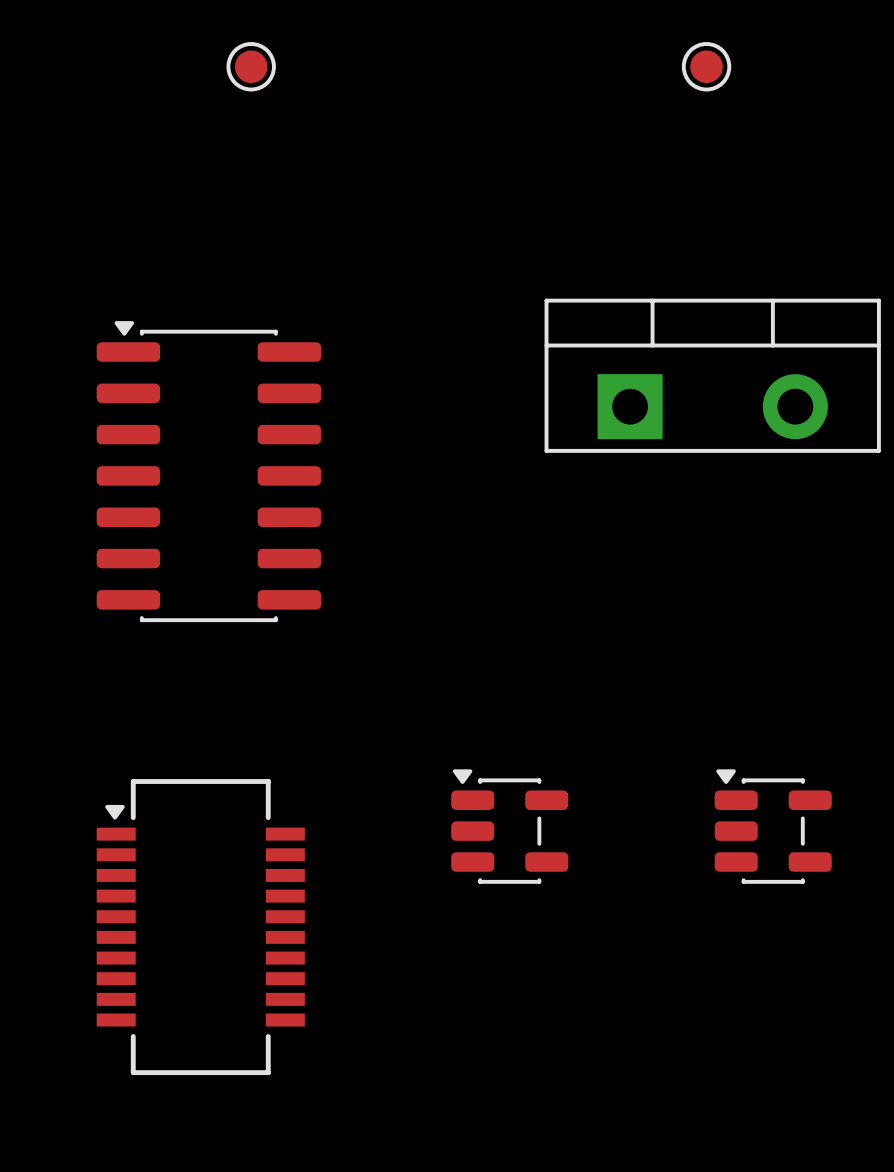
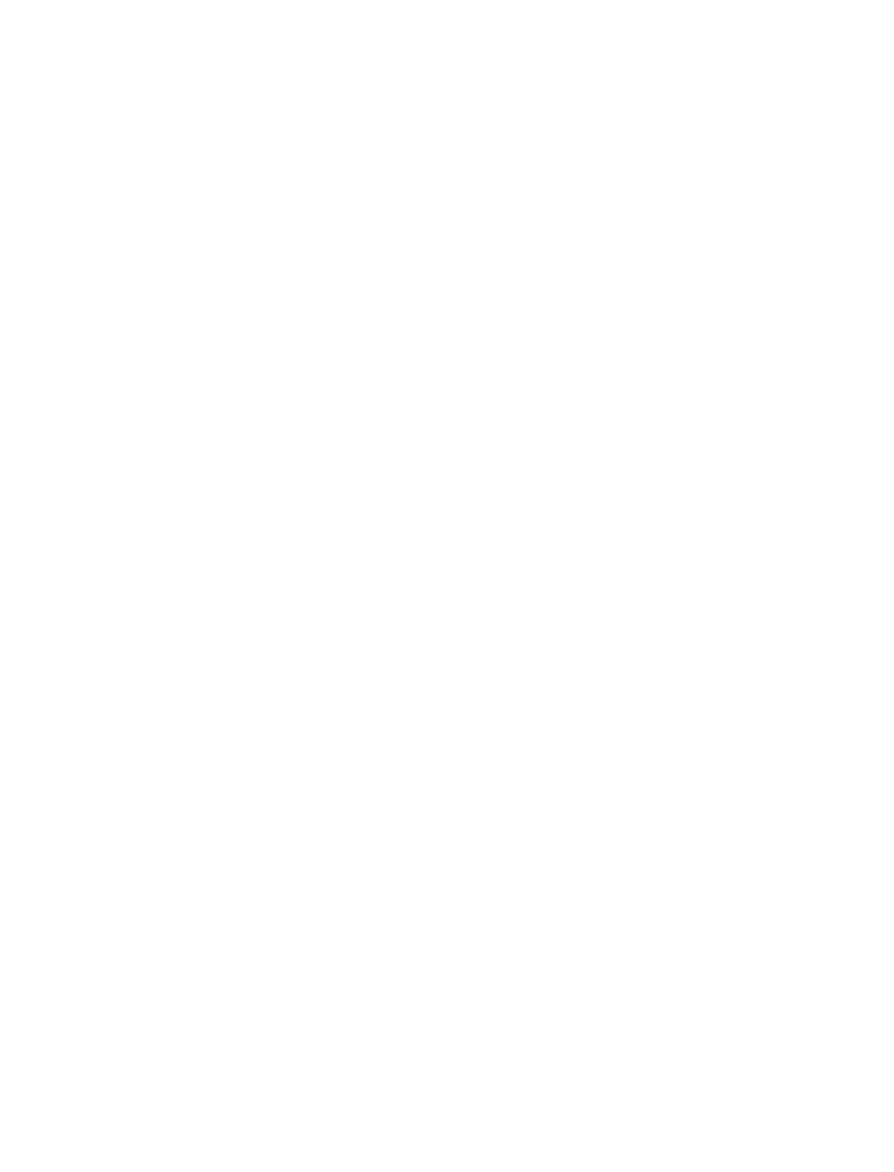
part: (251, 66) -> none
part: (706, 66) -> none
part: (712, 375) -> none
part: (208, 471) -> none
part: (509, 826) -> none
part: (773, 826) -> none
part: (200, 927) -> none

